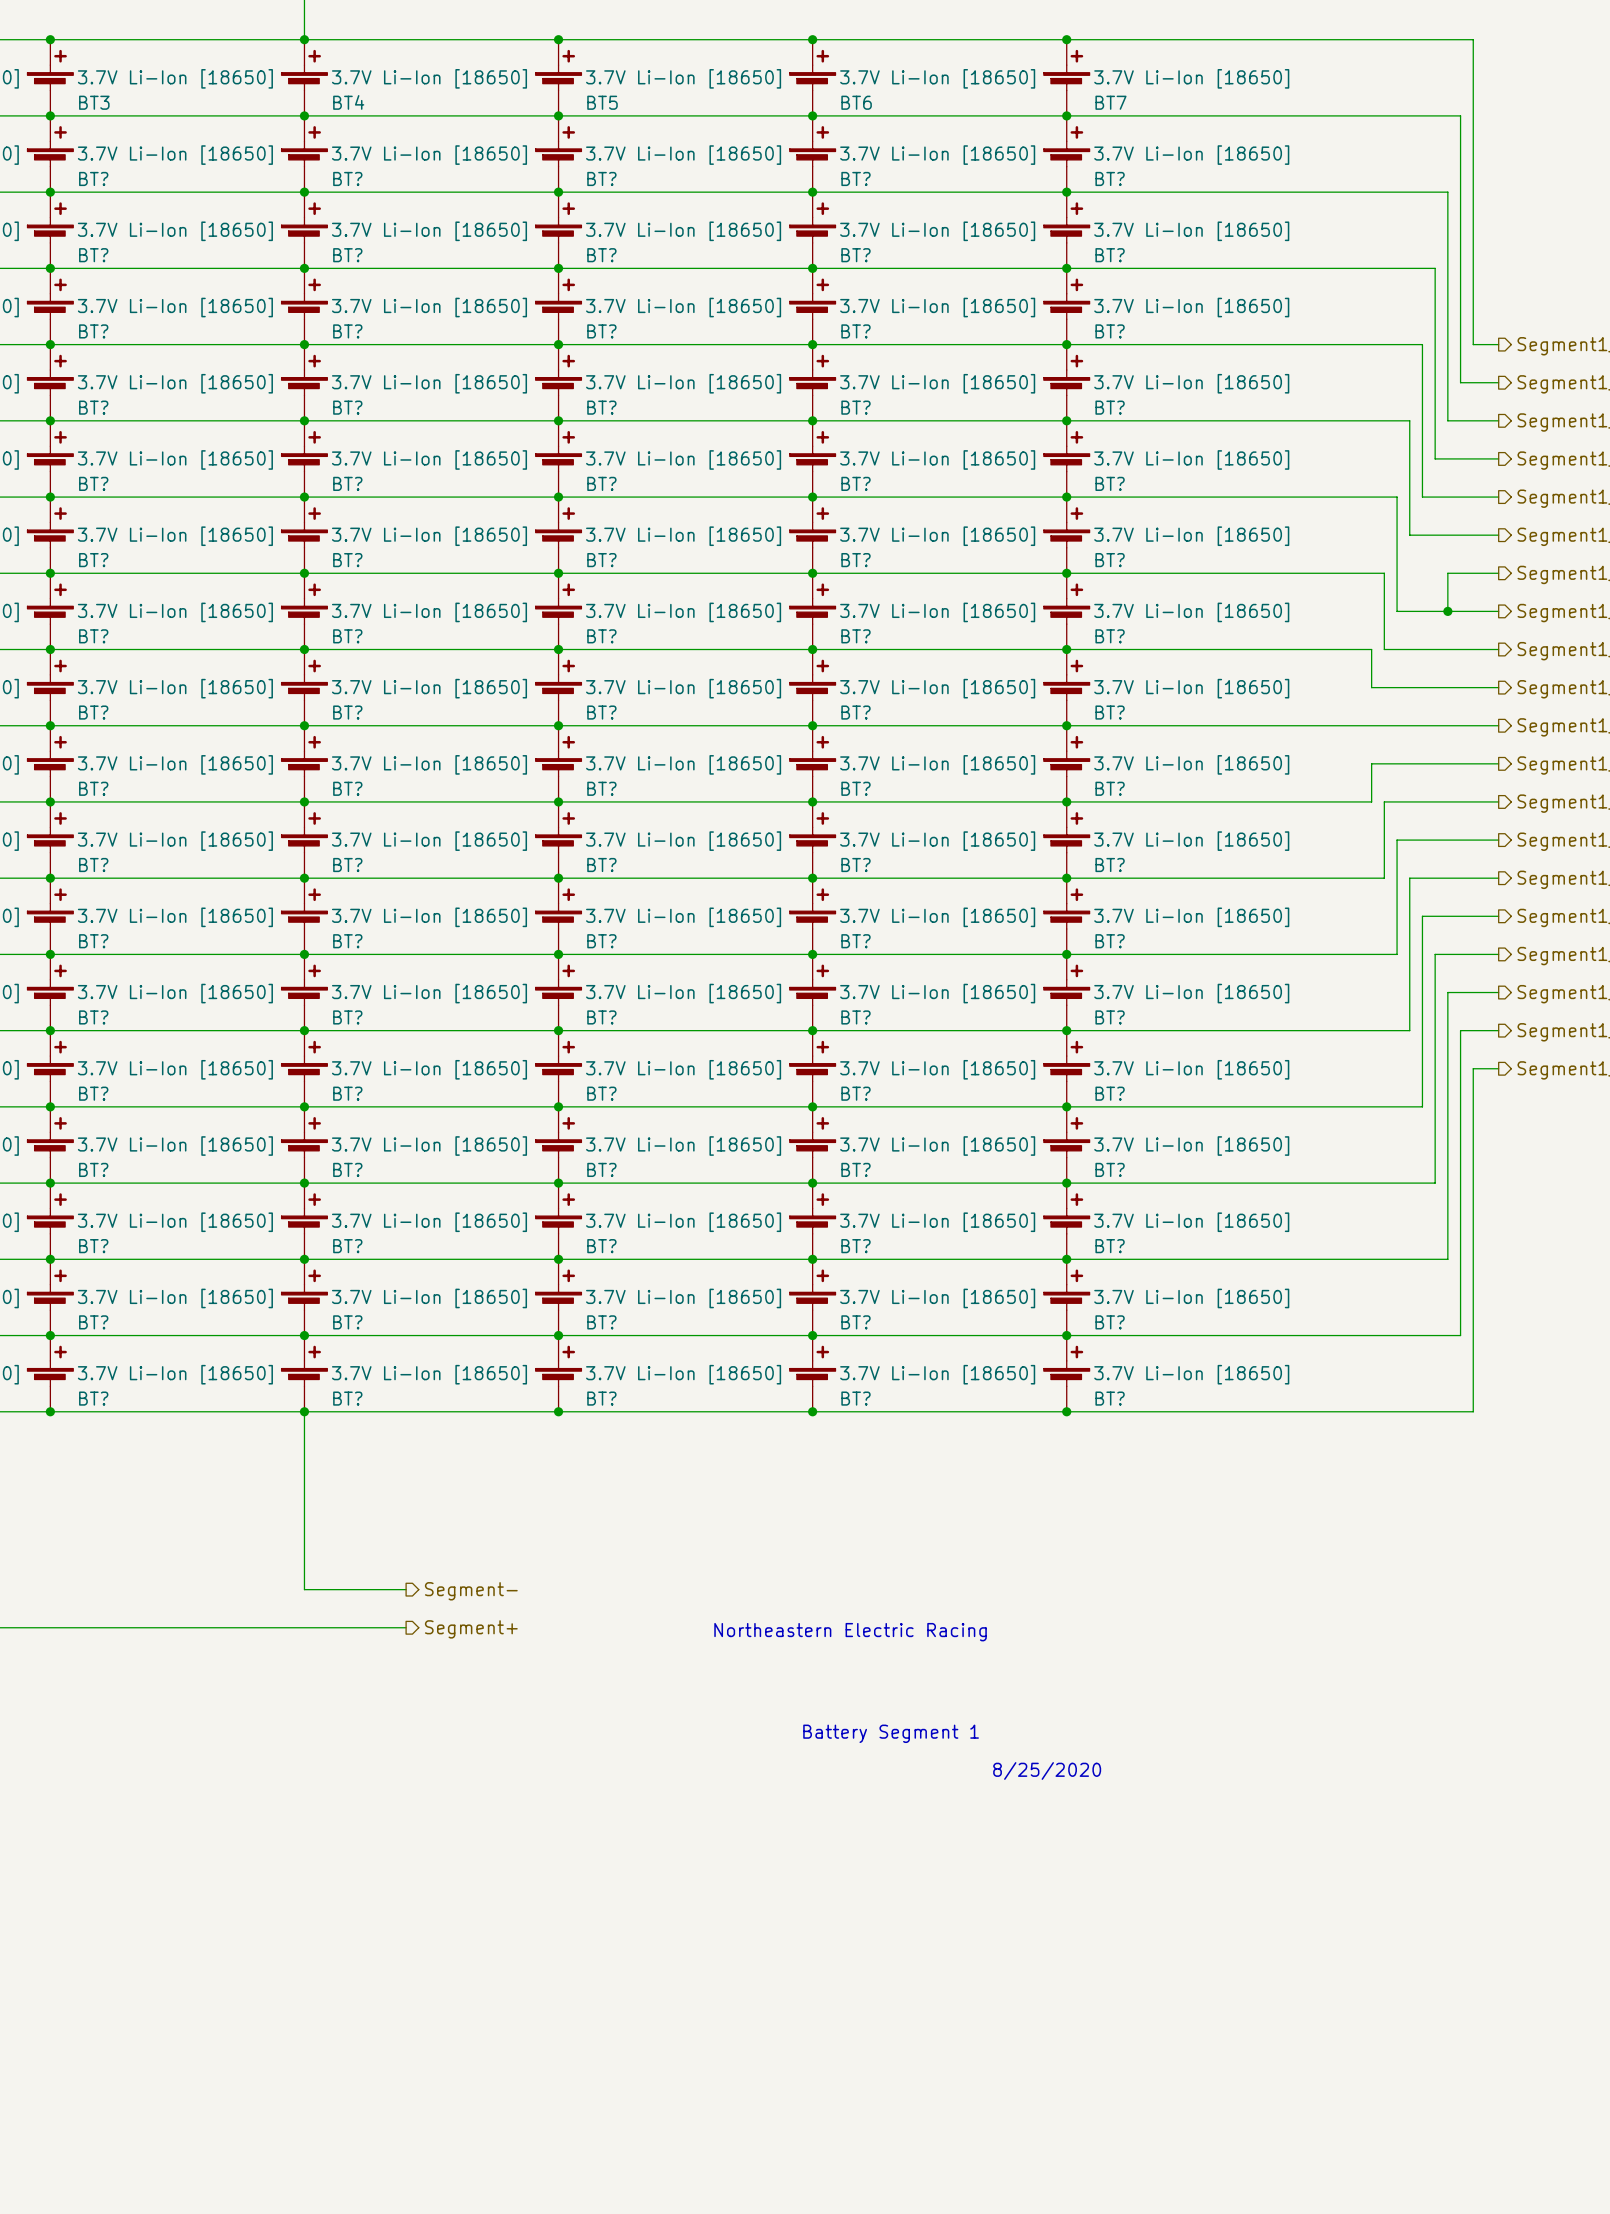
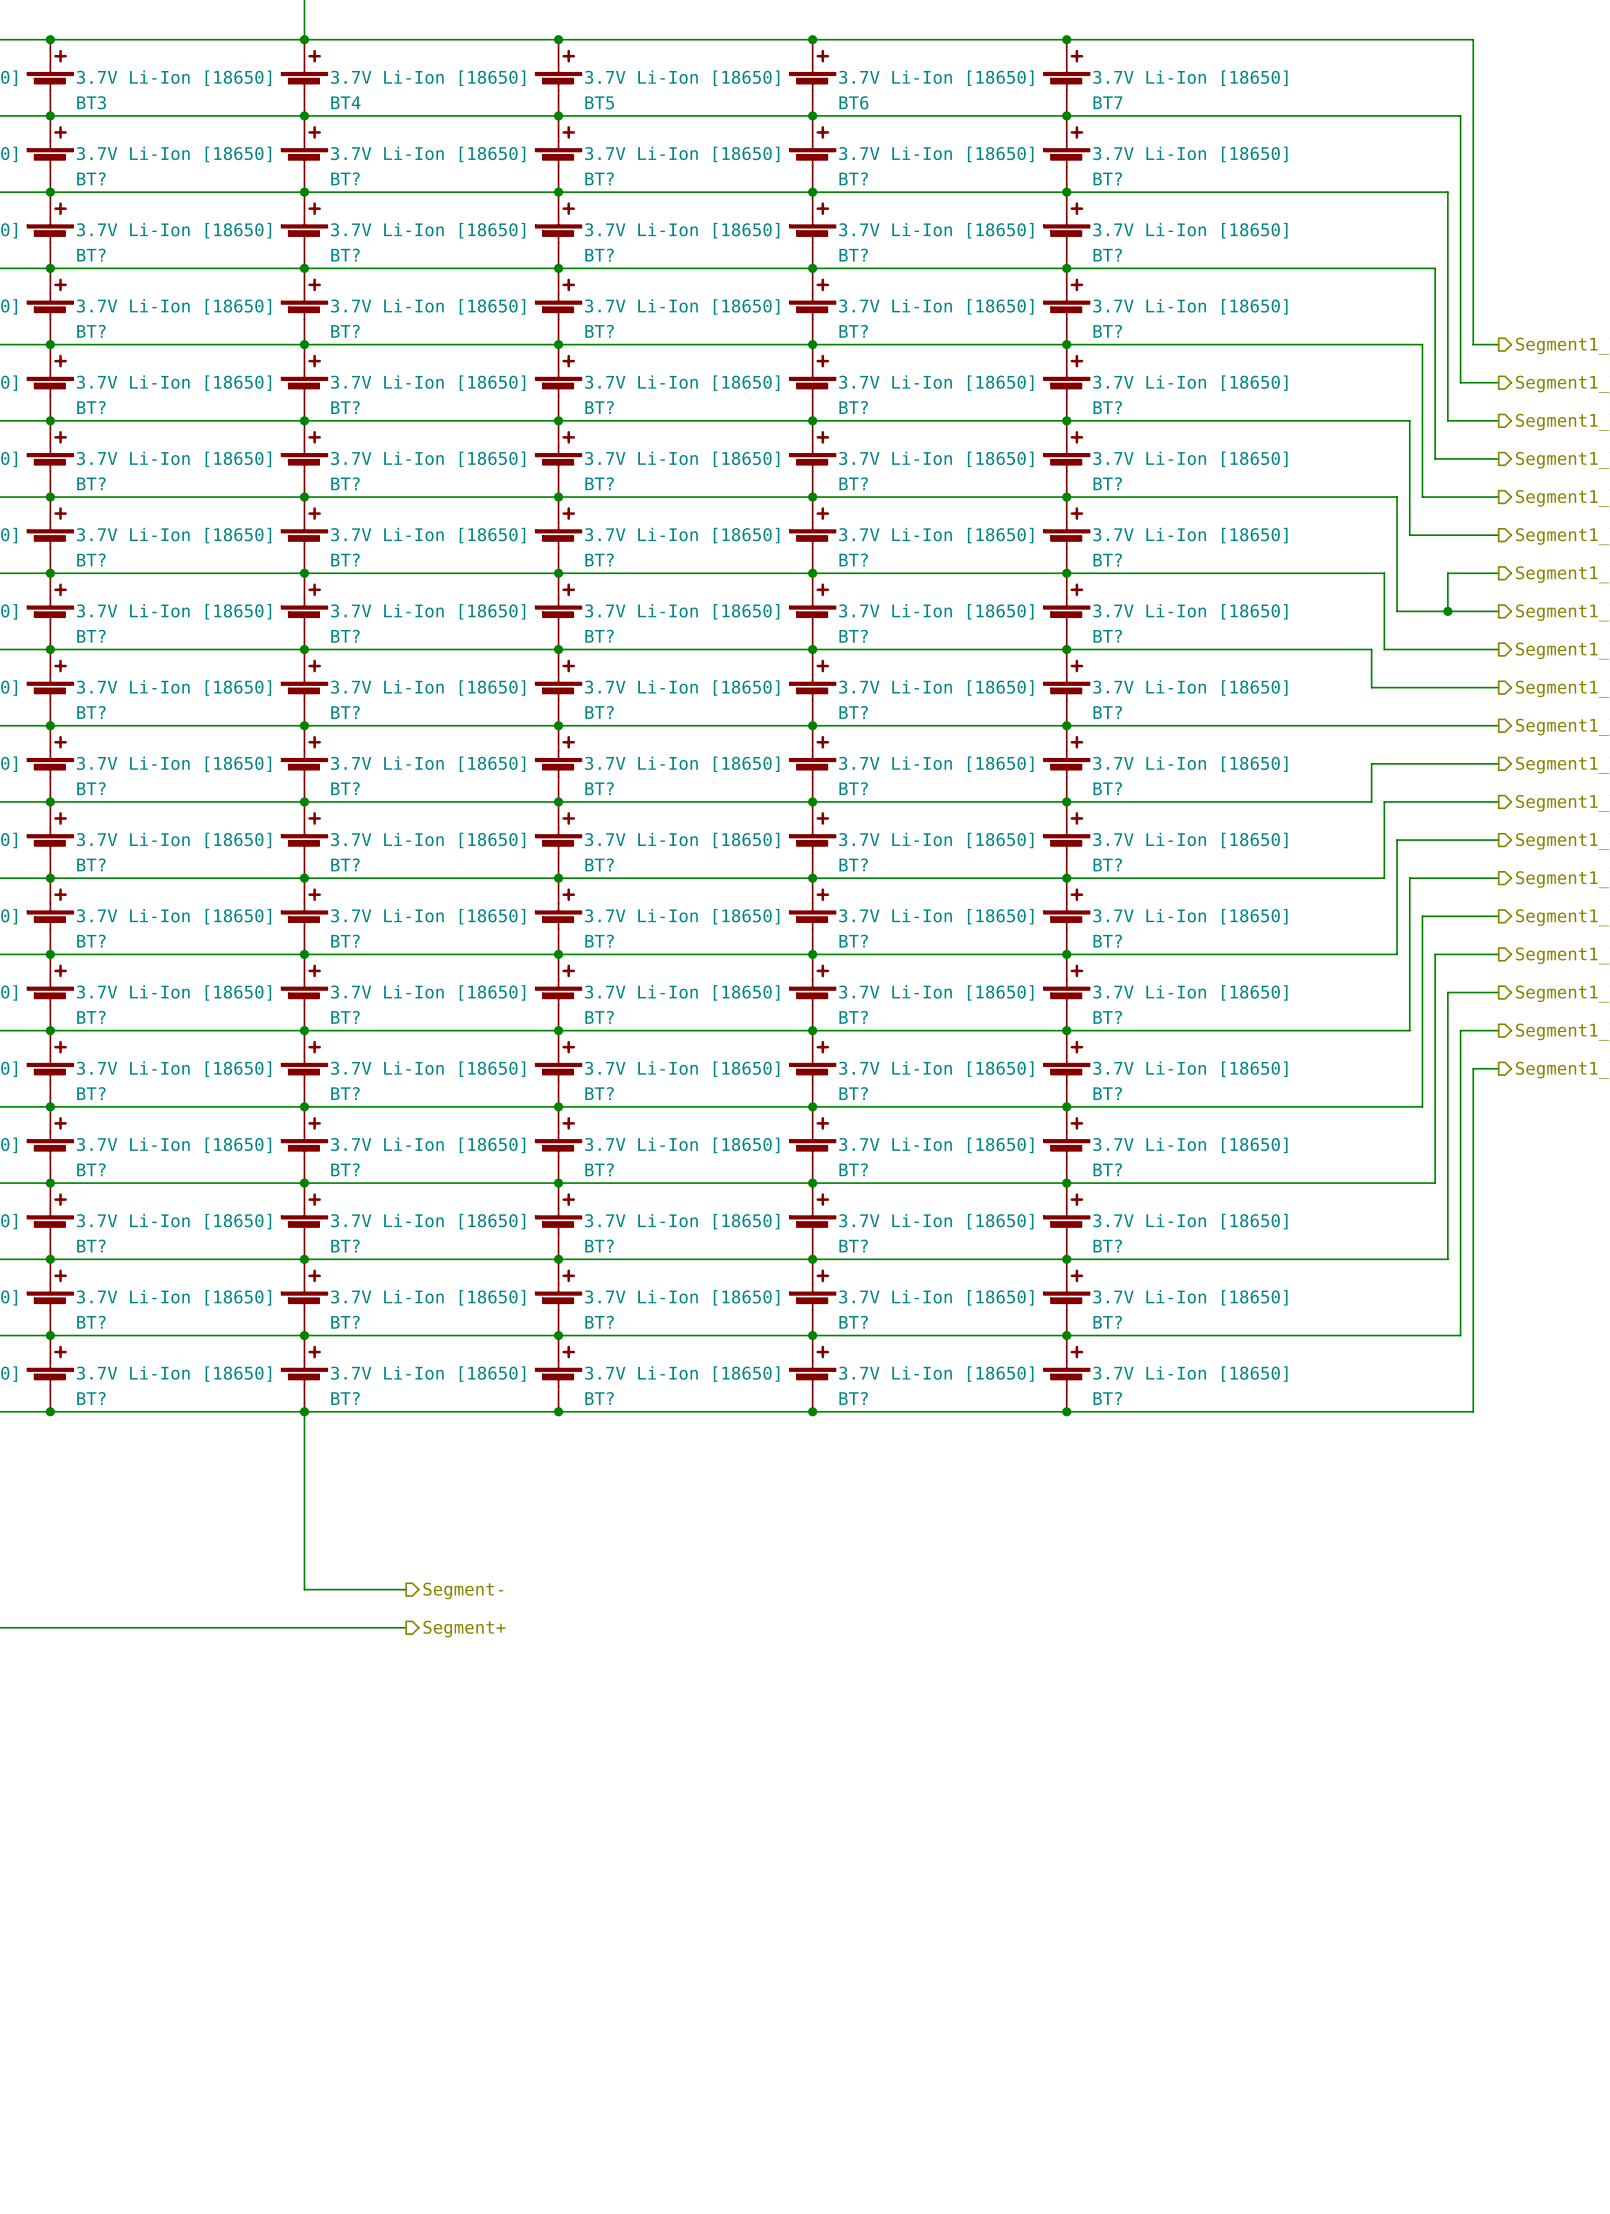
text: Northeastern Electric Racing (850, 1632) -> none
text: Battery Segment 1 (891, 1733) -> none
text: 8/25/2020 (1047, 1771) -> none

